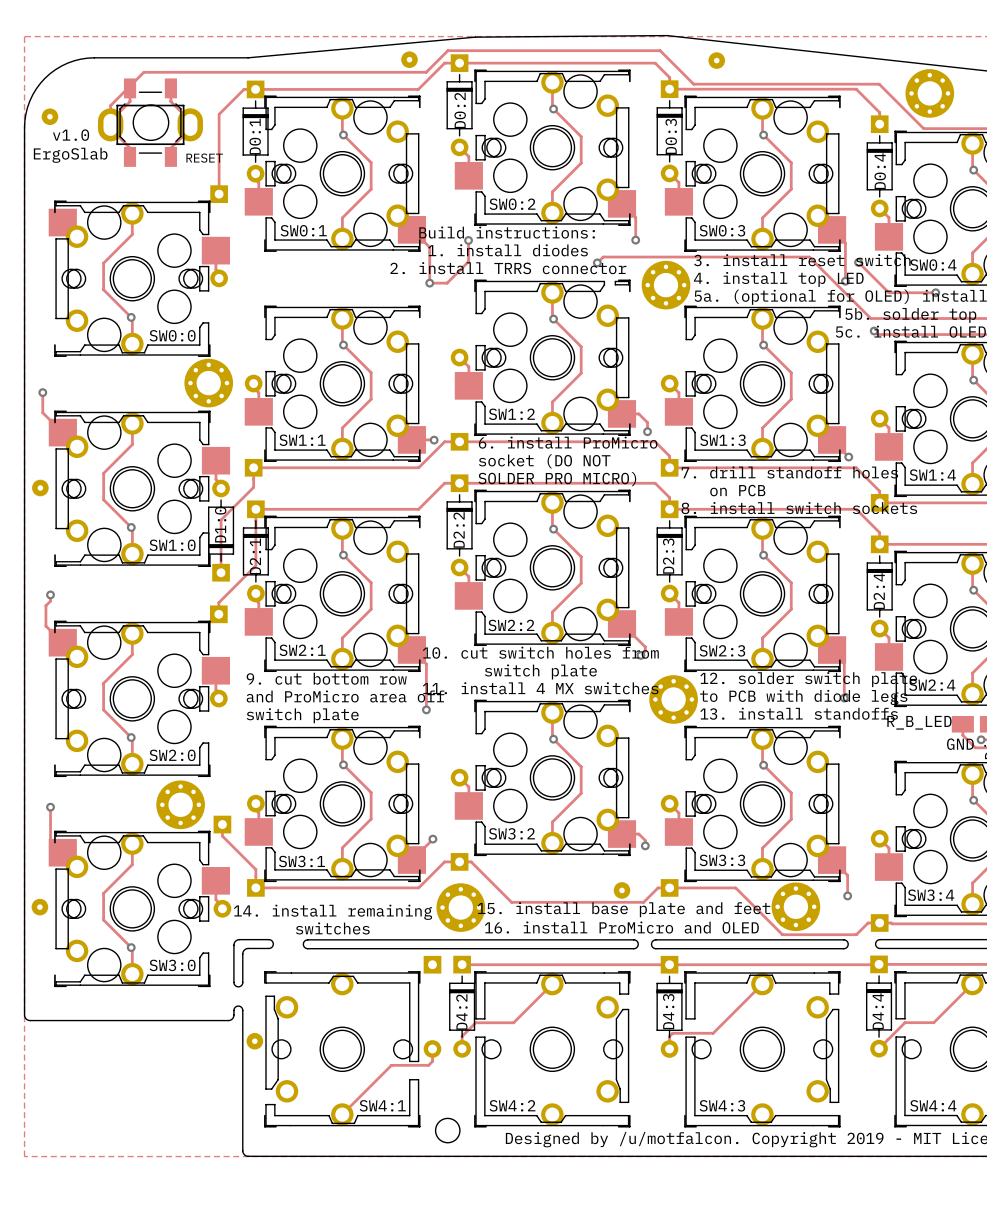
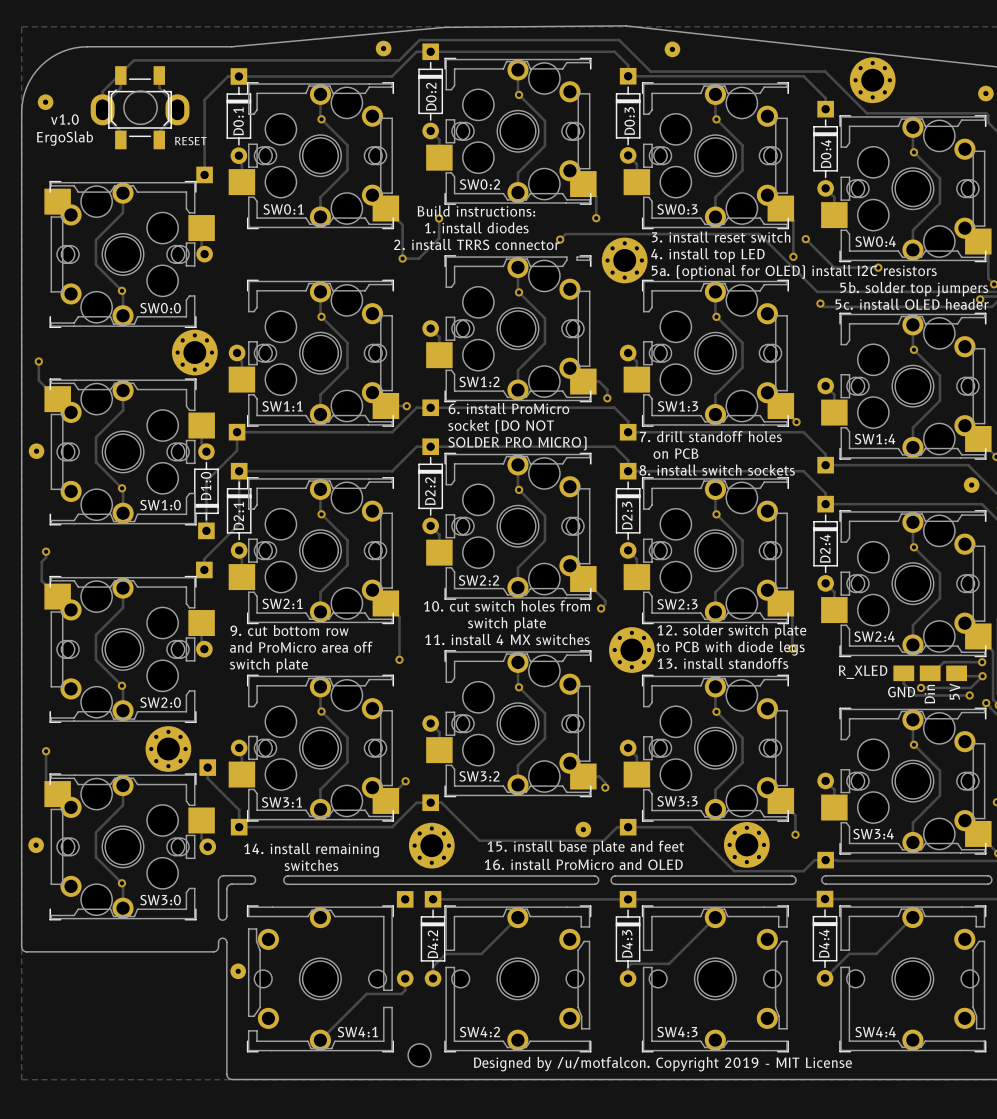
part value: R_B_LED (919, 722) -> R_XLED (863, 672)

